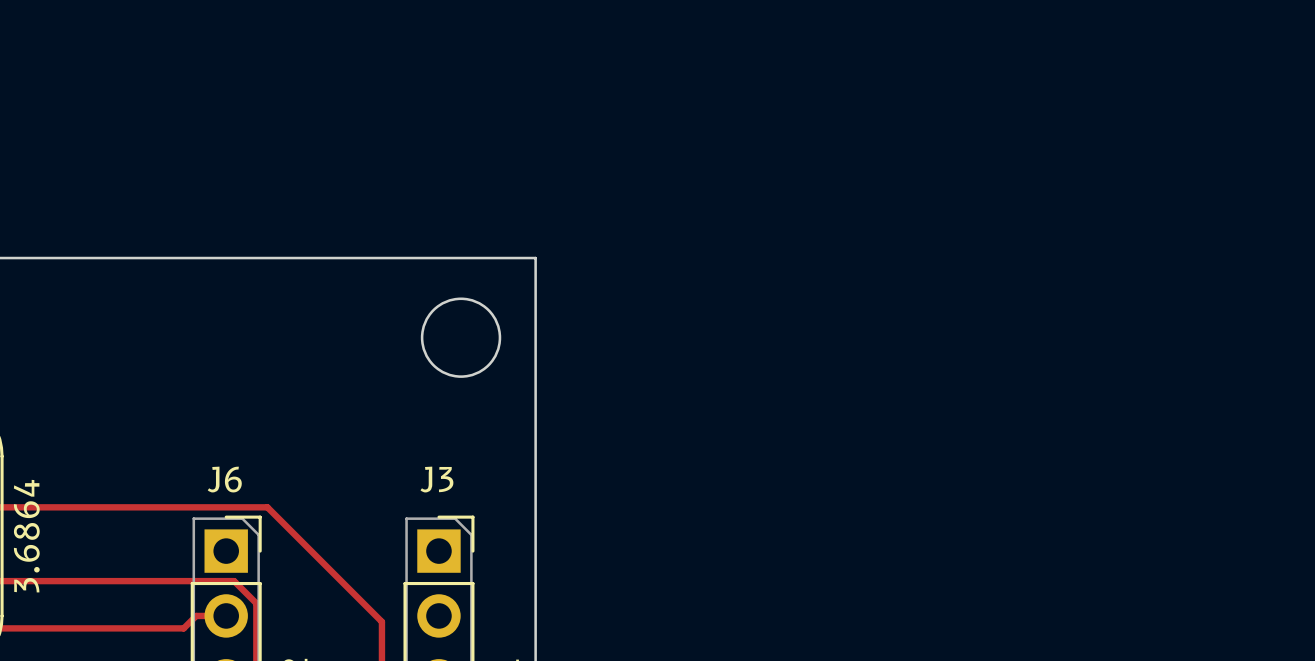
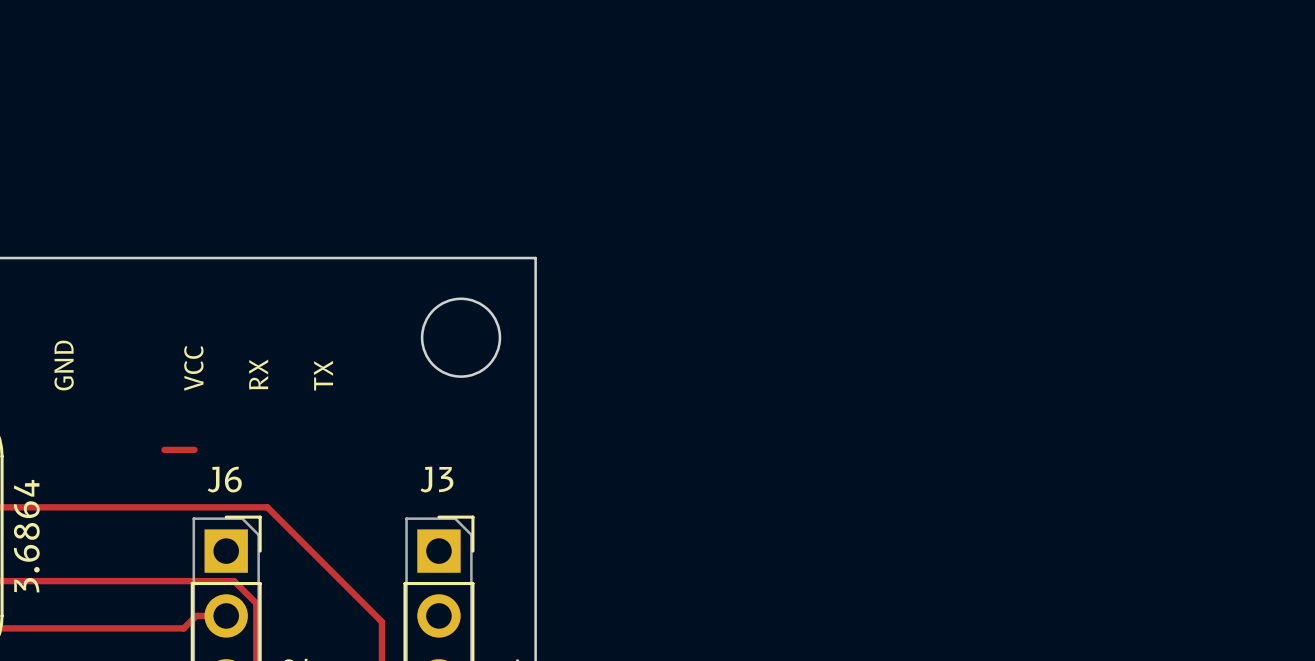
text: none -> GND (64, 365)
text: none -> VCC (193, 368)
text: none -> RX (258, 374)
text: none -> TX (323, 375)
track: none -> (164, 449) (194, 449)

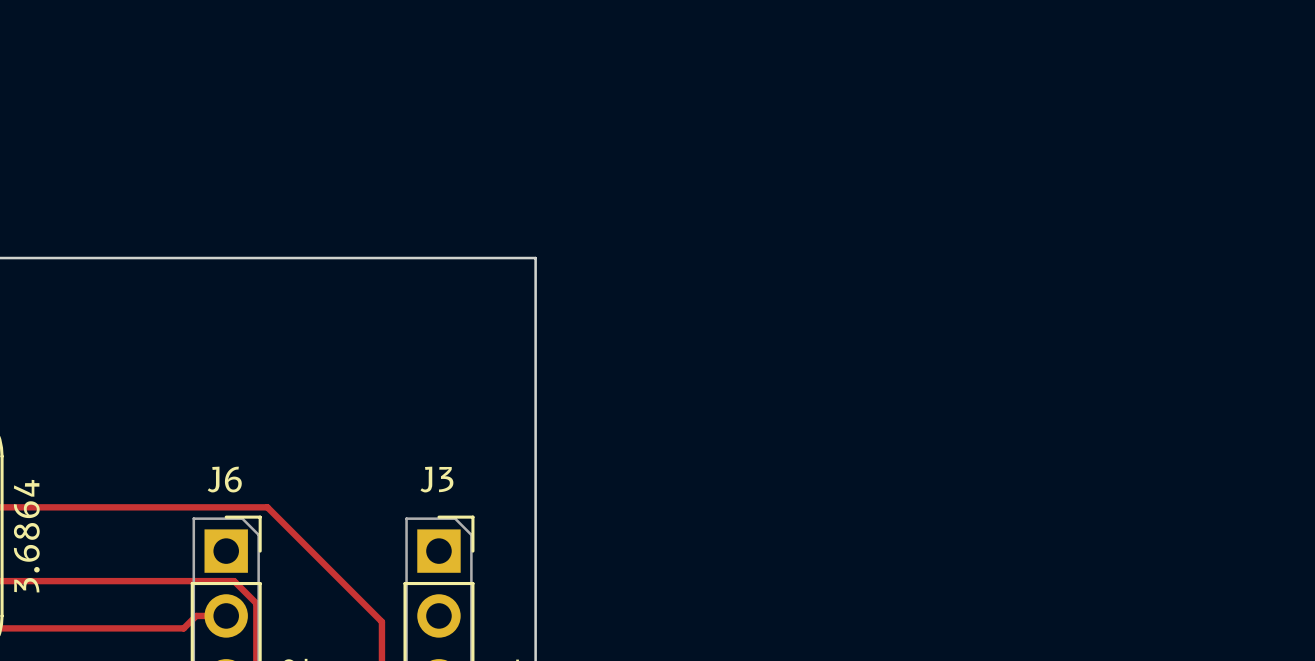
round board edge: [420, 297, 502, 378] -> none
text: GND (64, 365) -> none
text: VCC (193, 368) -> none
text: RX (258, 374) -> none
text: TX (323, 375) -> none
track: (164, 449) (194, 449) -> none

